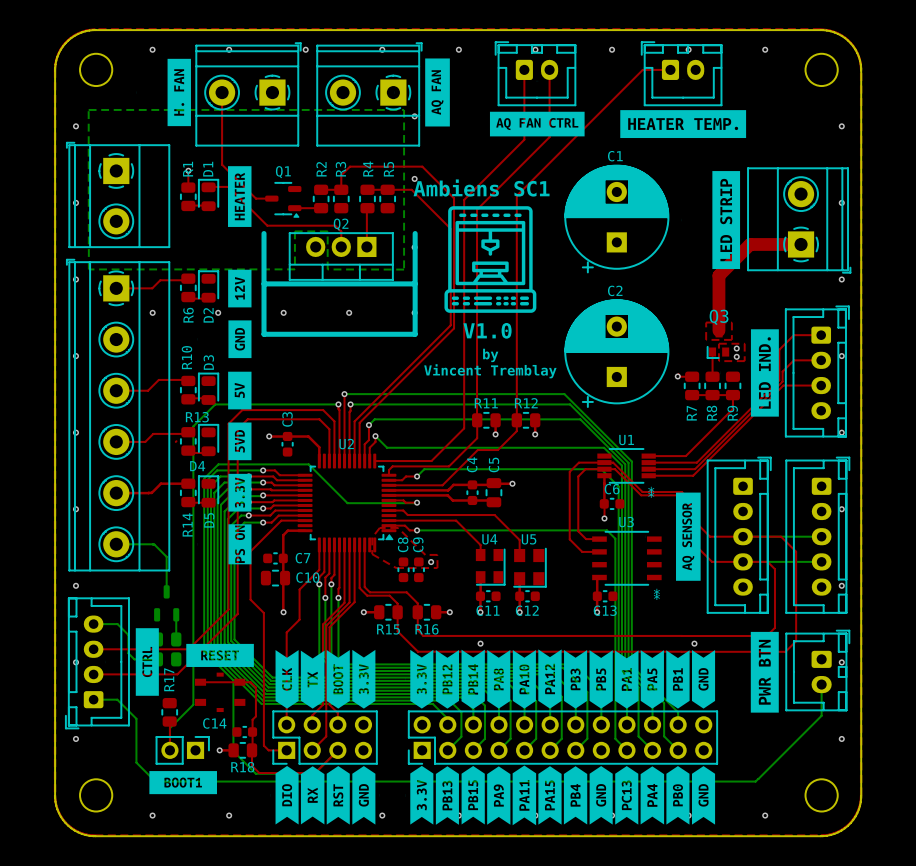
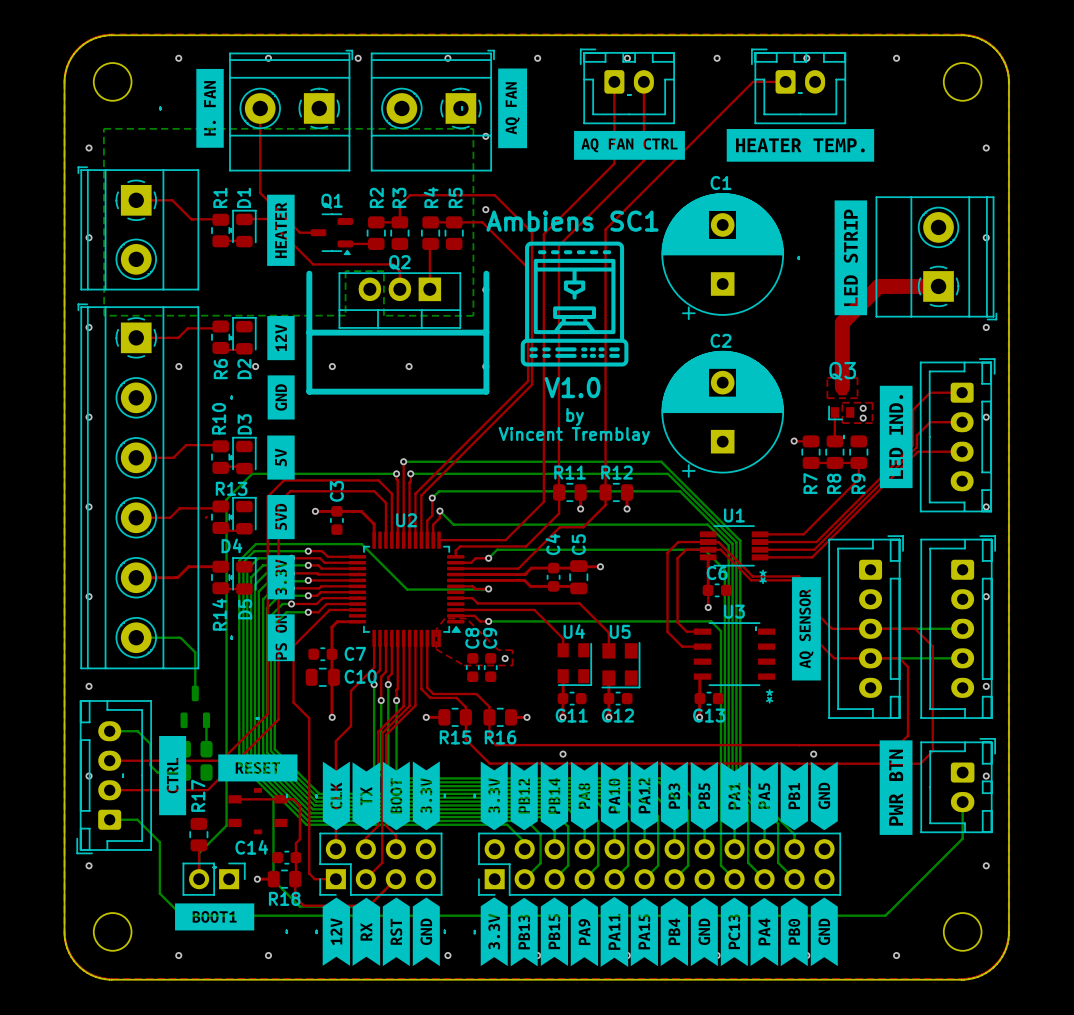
top track: (188, 170) (188, 187) -> (136, 200) (172, 200) (191, 219) (220, 219)
via: (188, 170) -> none
drawing: [275, 765, 299, 825] -> none
part: none -> (336, 931)

